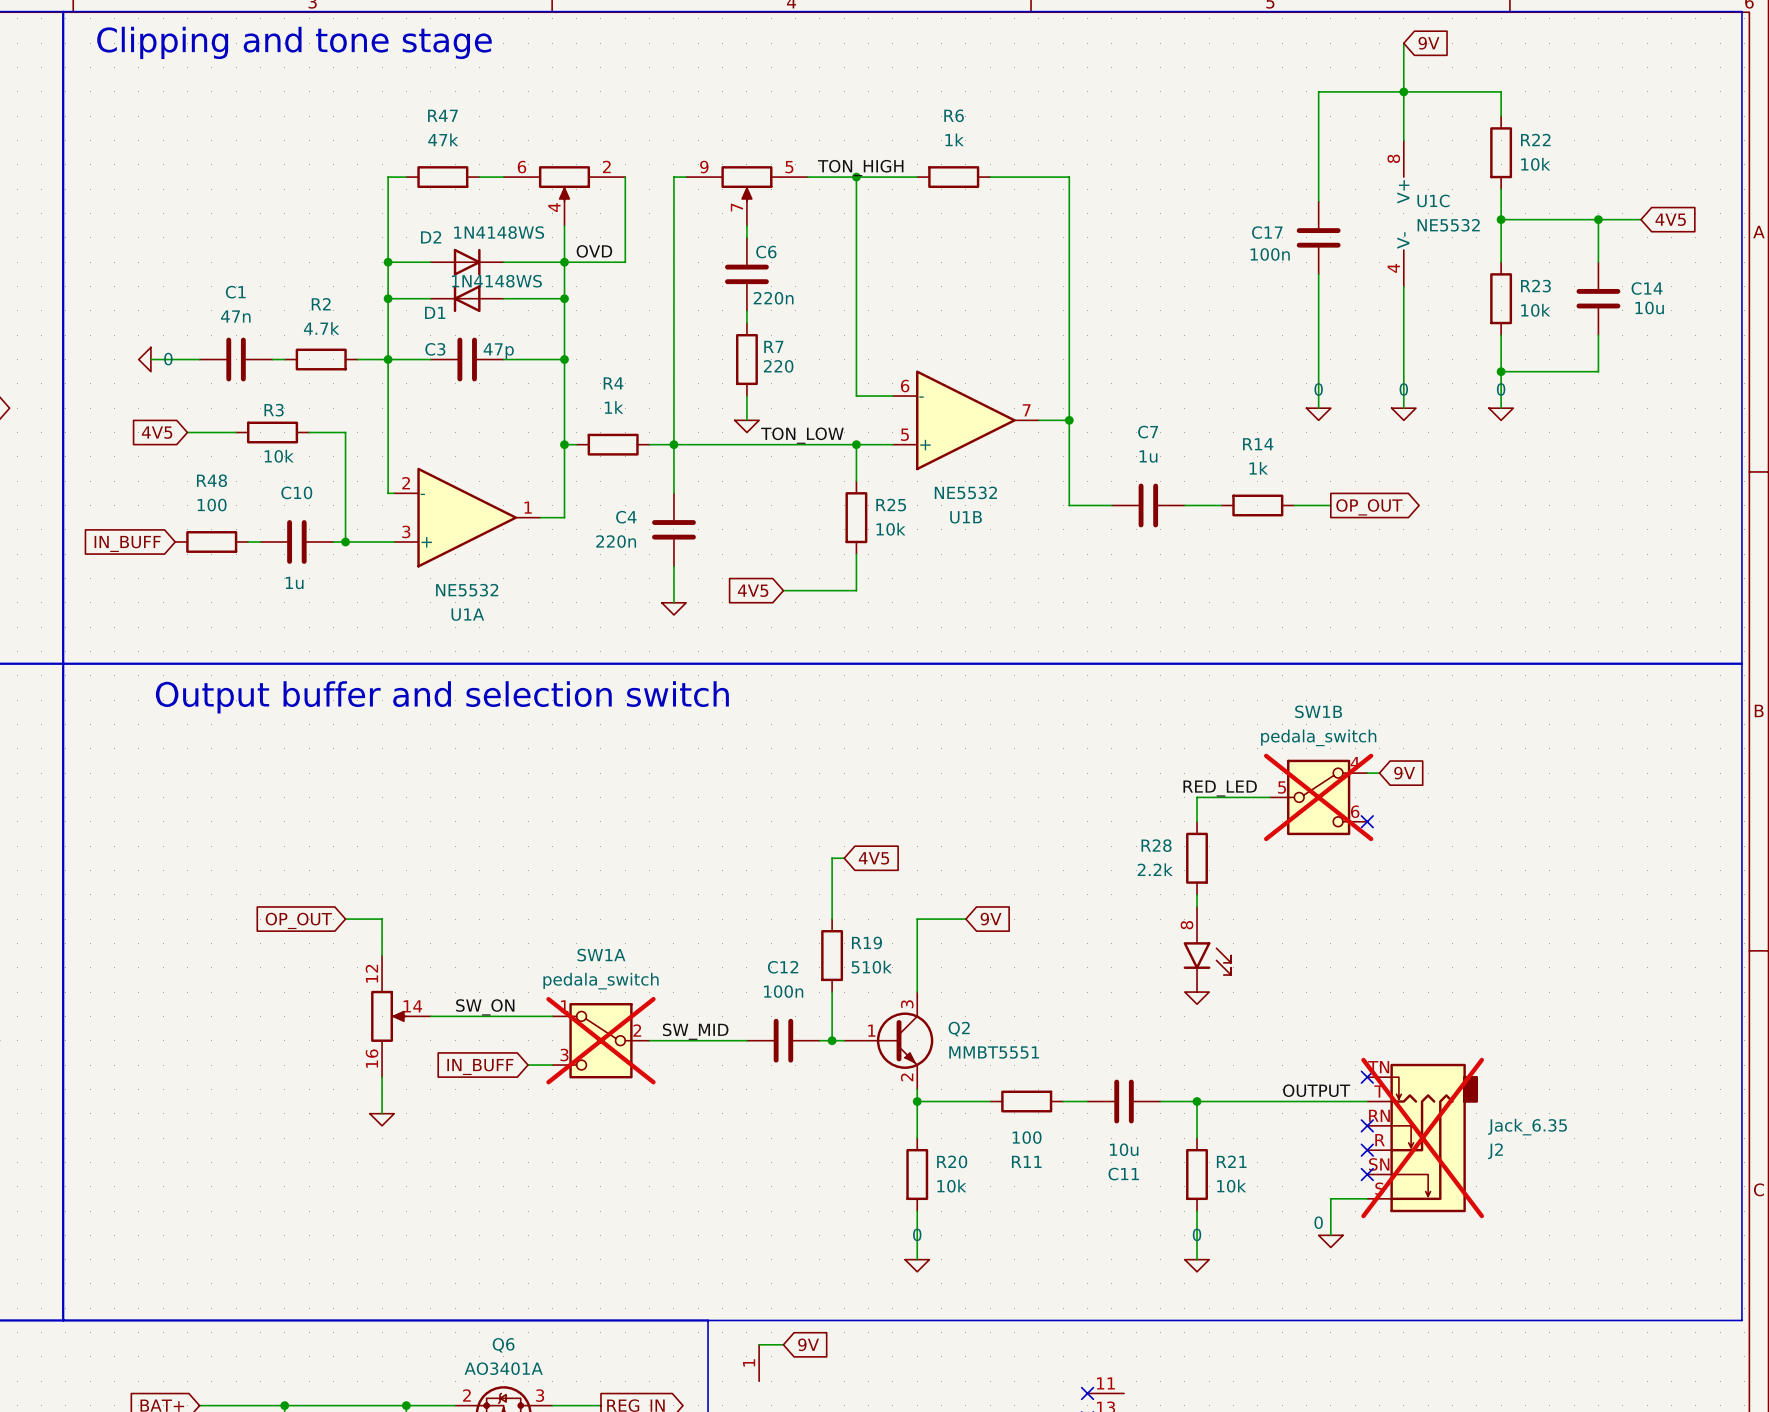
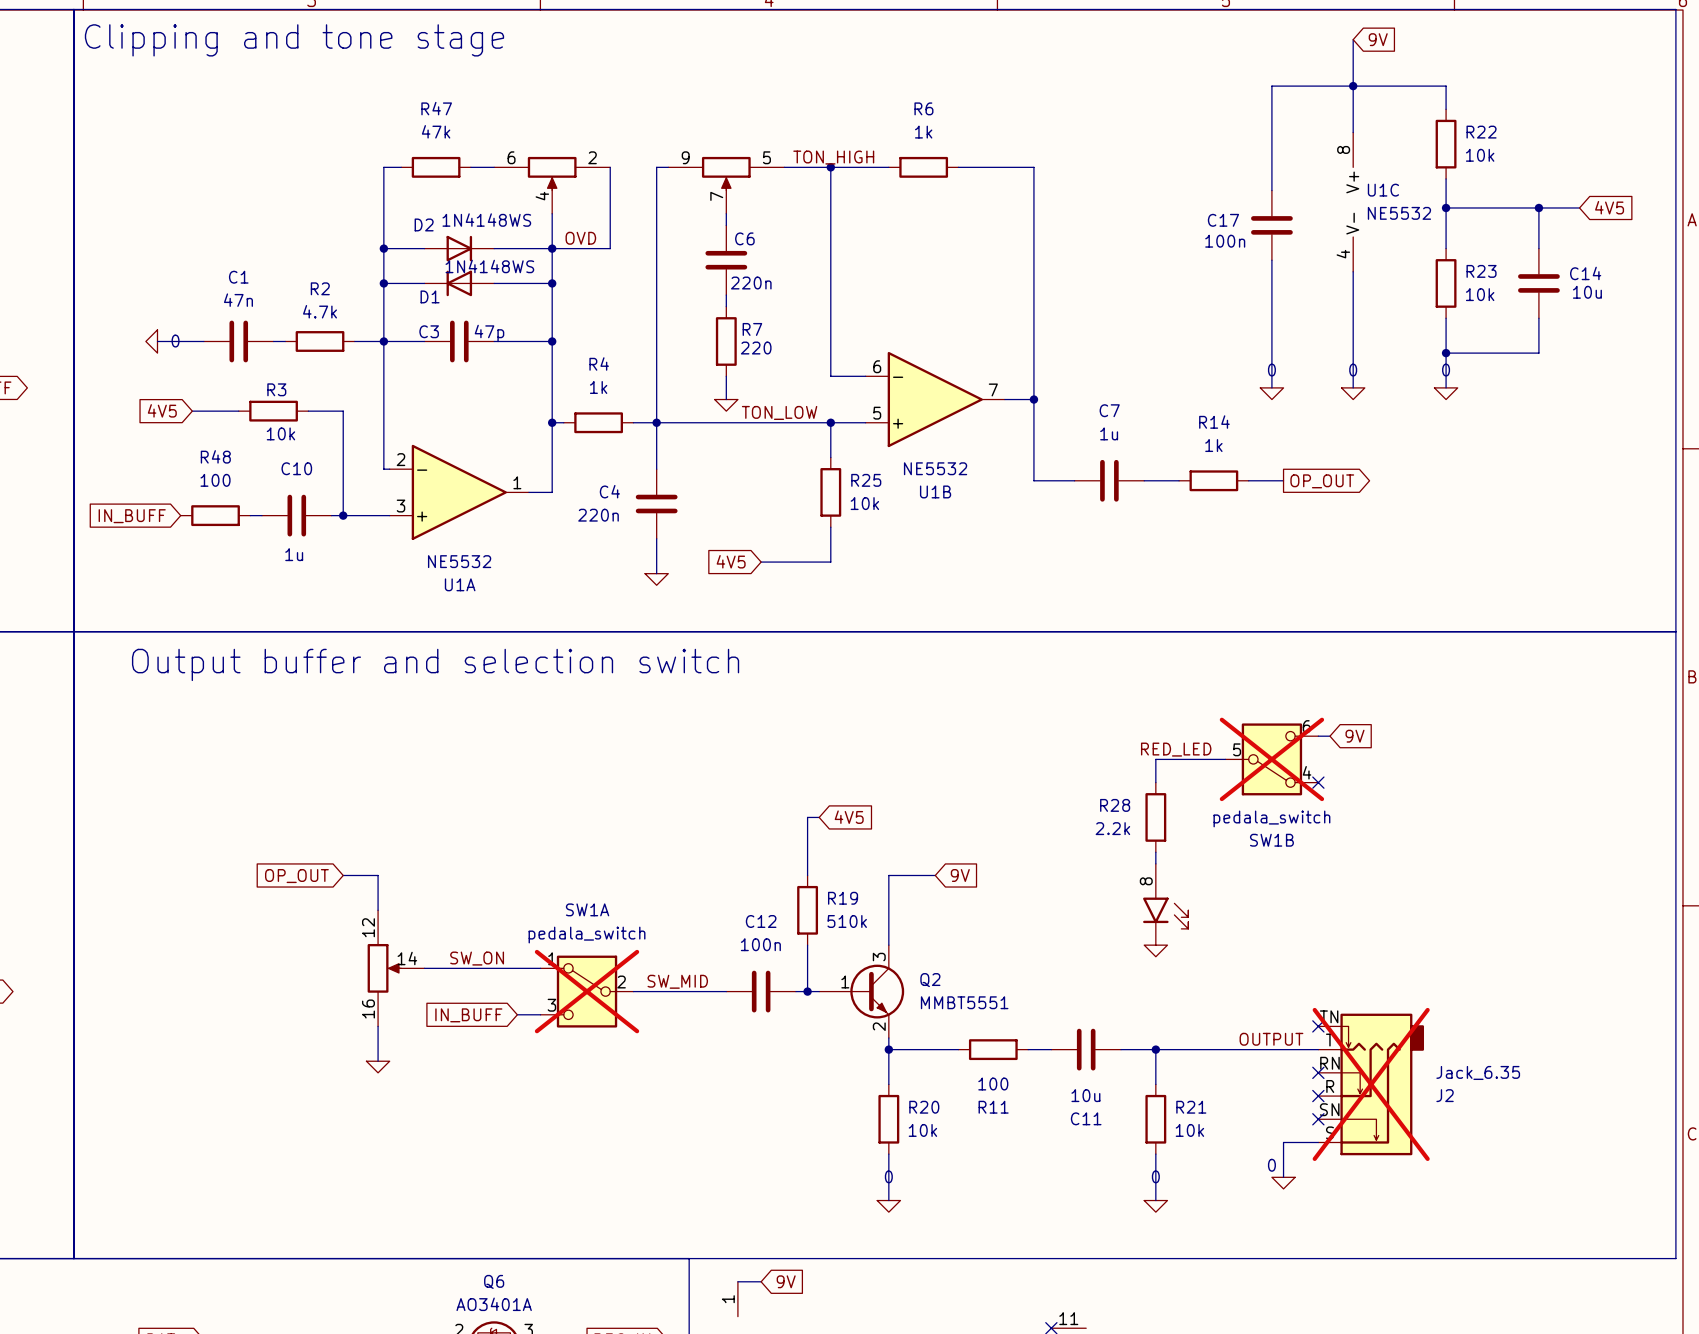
SW1B flip: as is (1318, 797) -> up-down (1271, 759)

